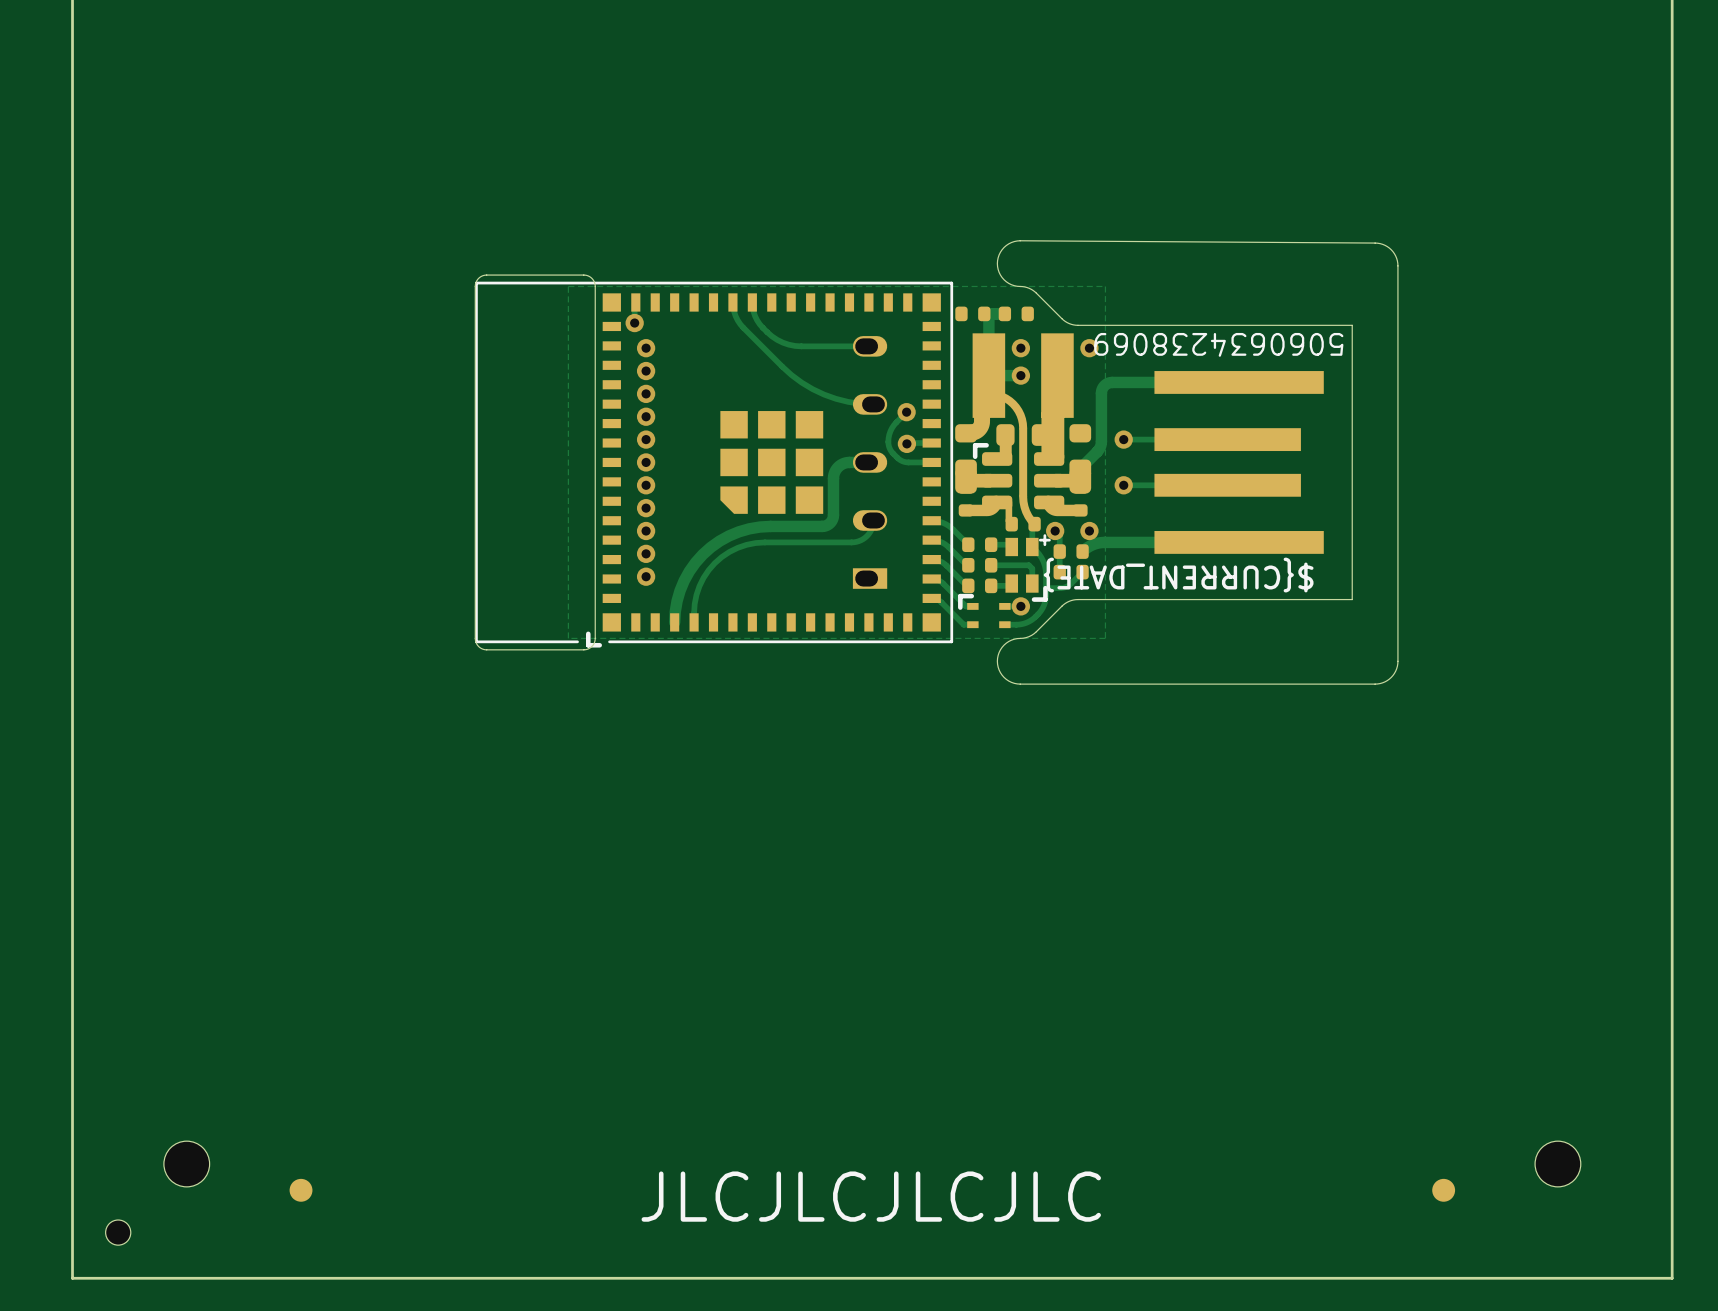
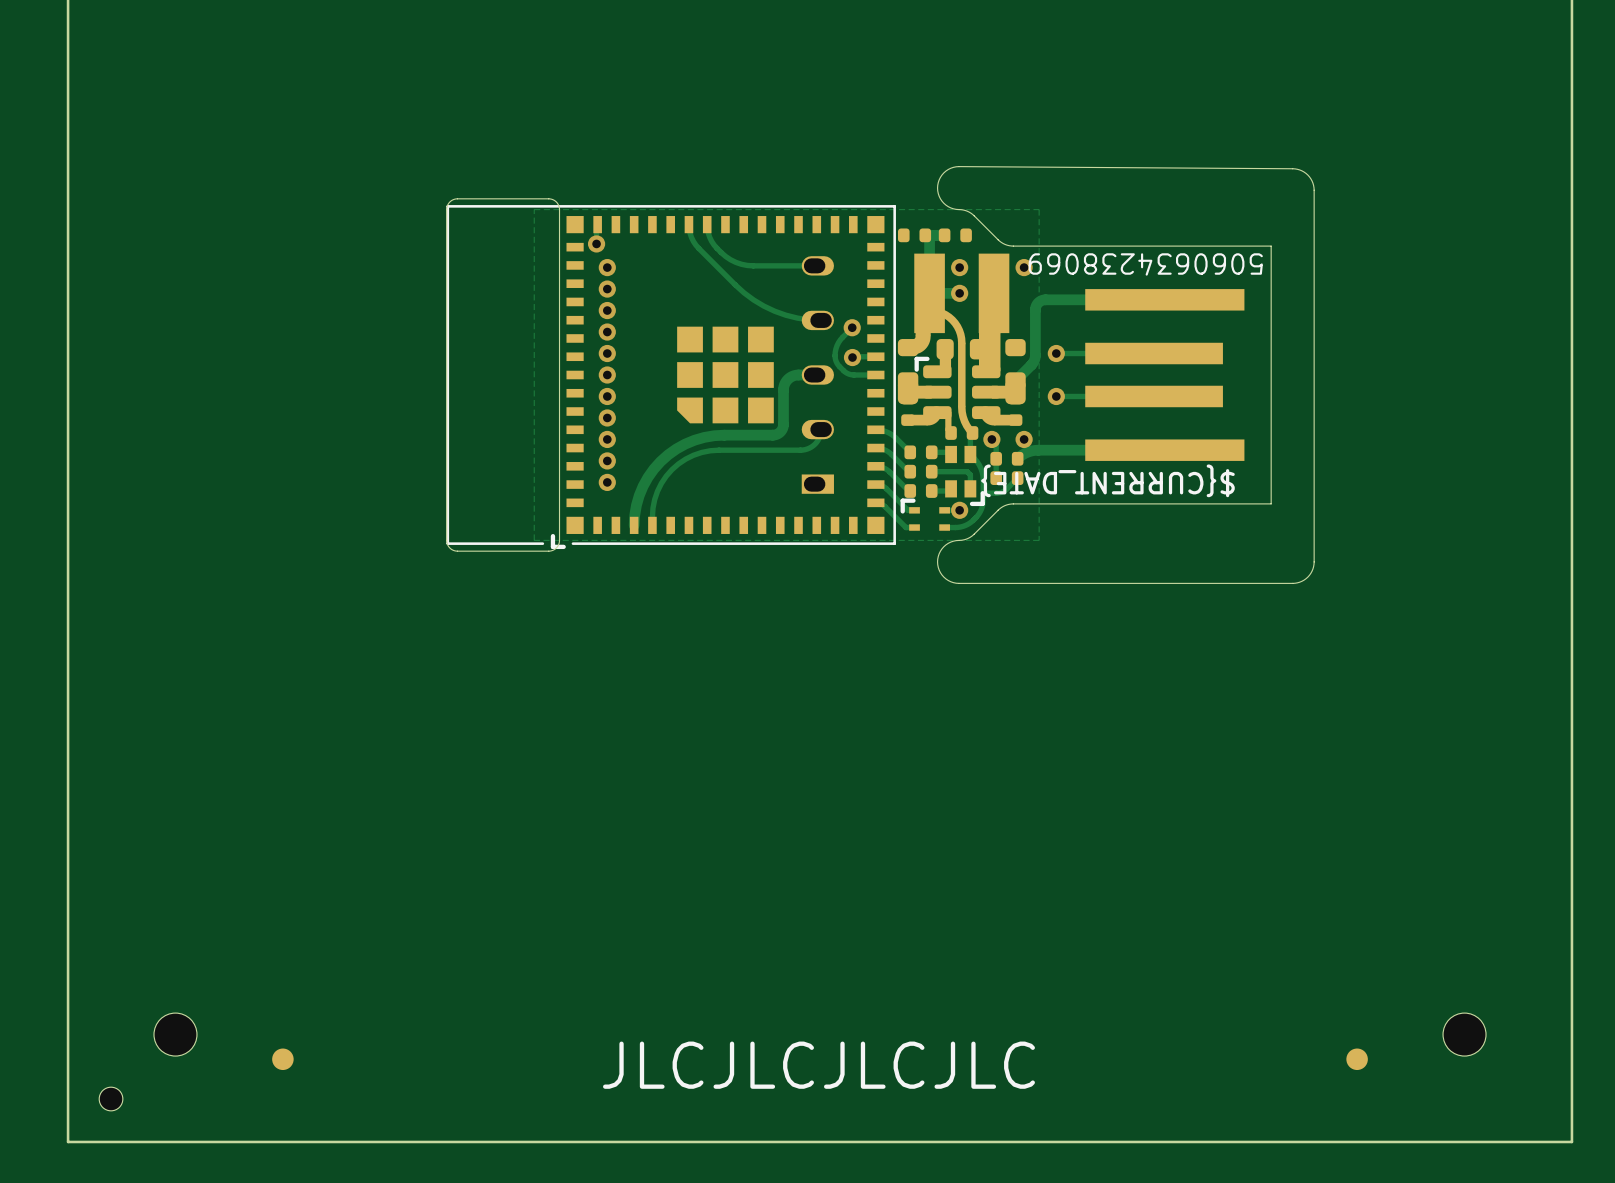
part footprint: [1005, 534, 1051, 602] -> [945, 445, 985, 507]

